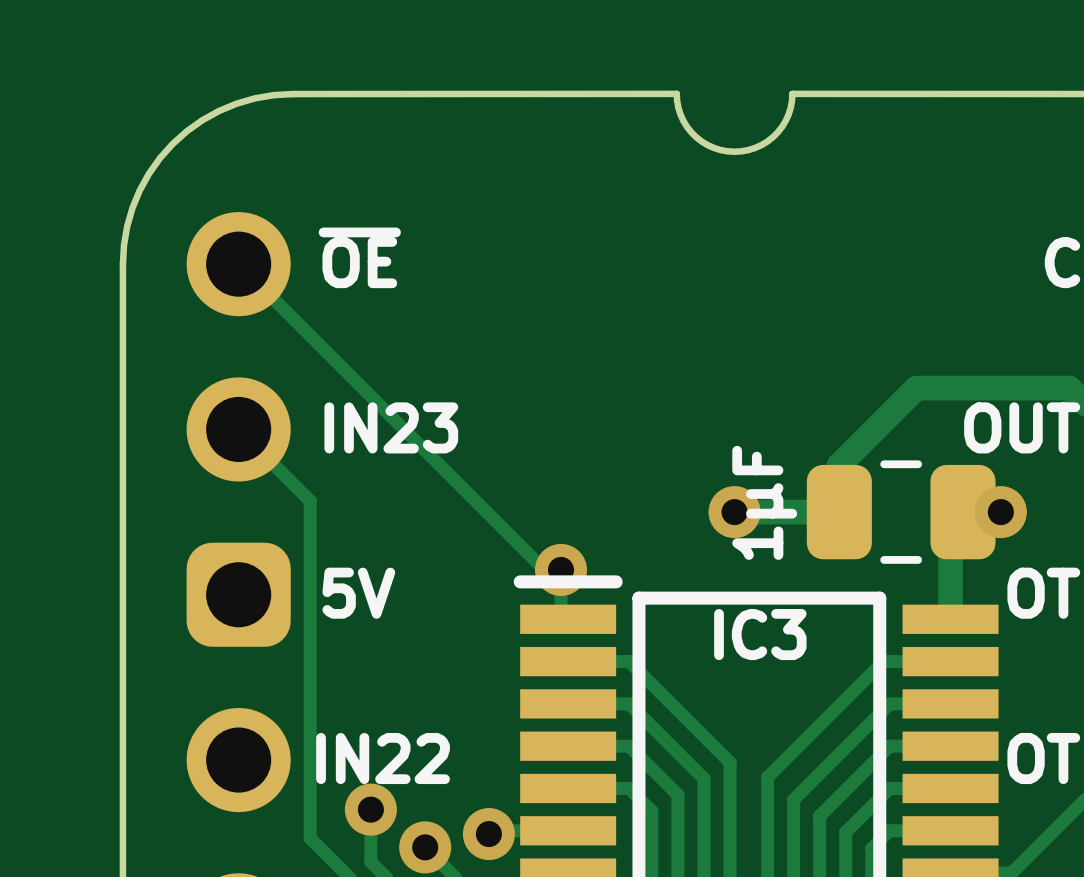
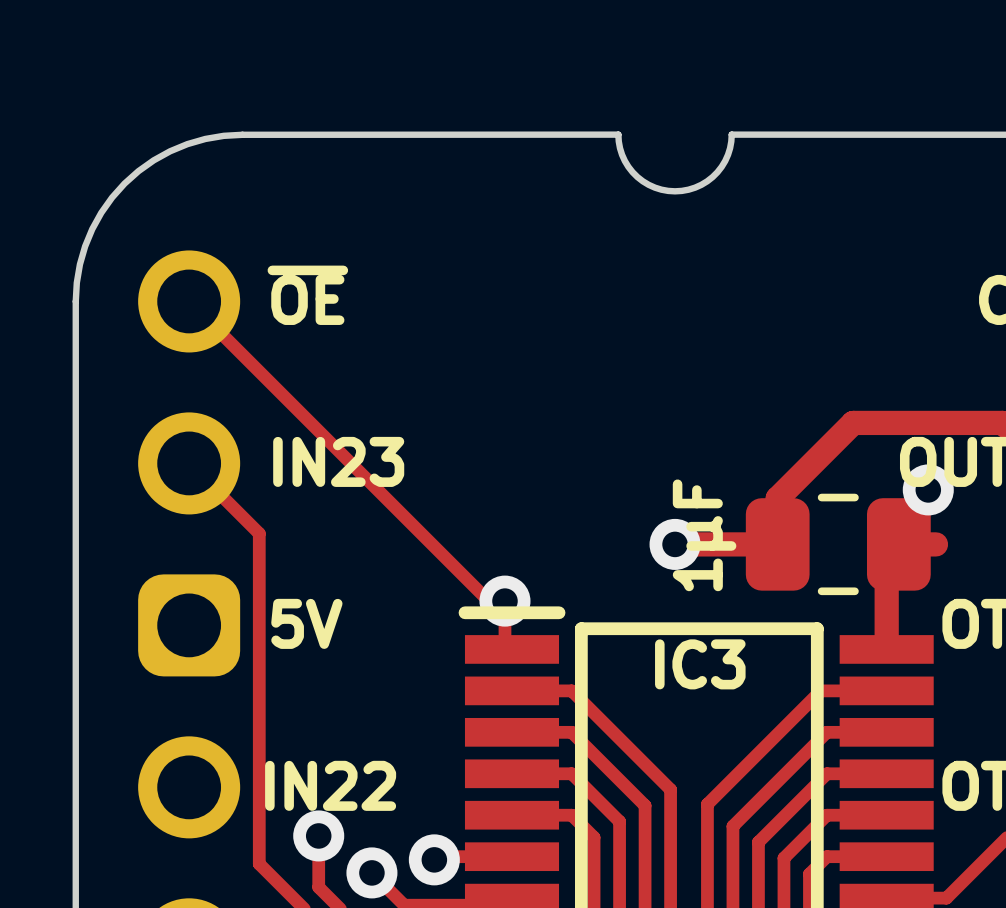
via position: (1000, 512) -> (928, 489)

